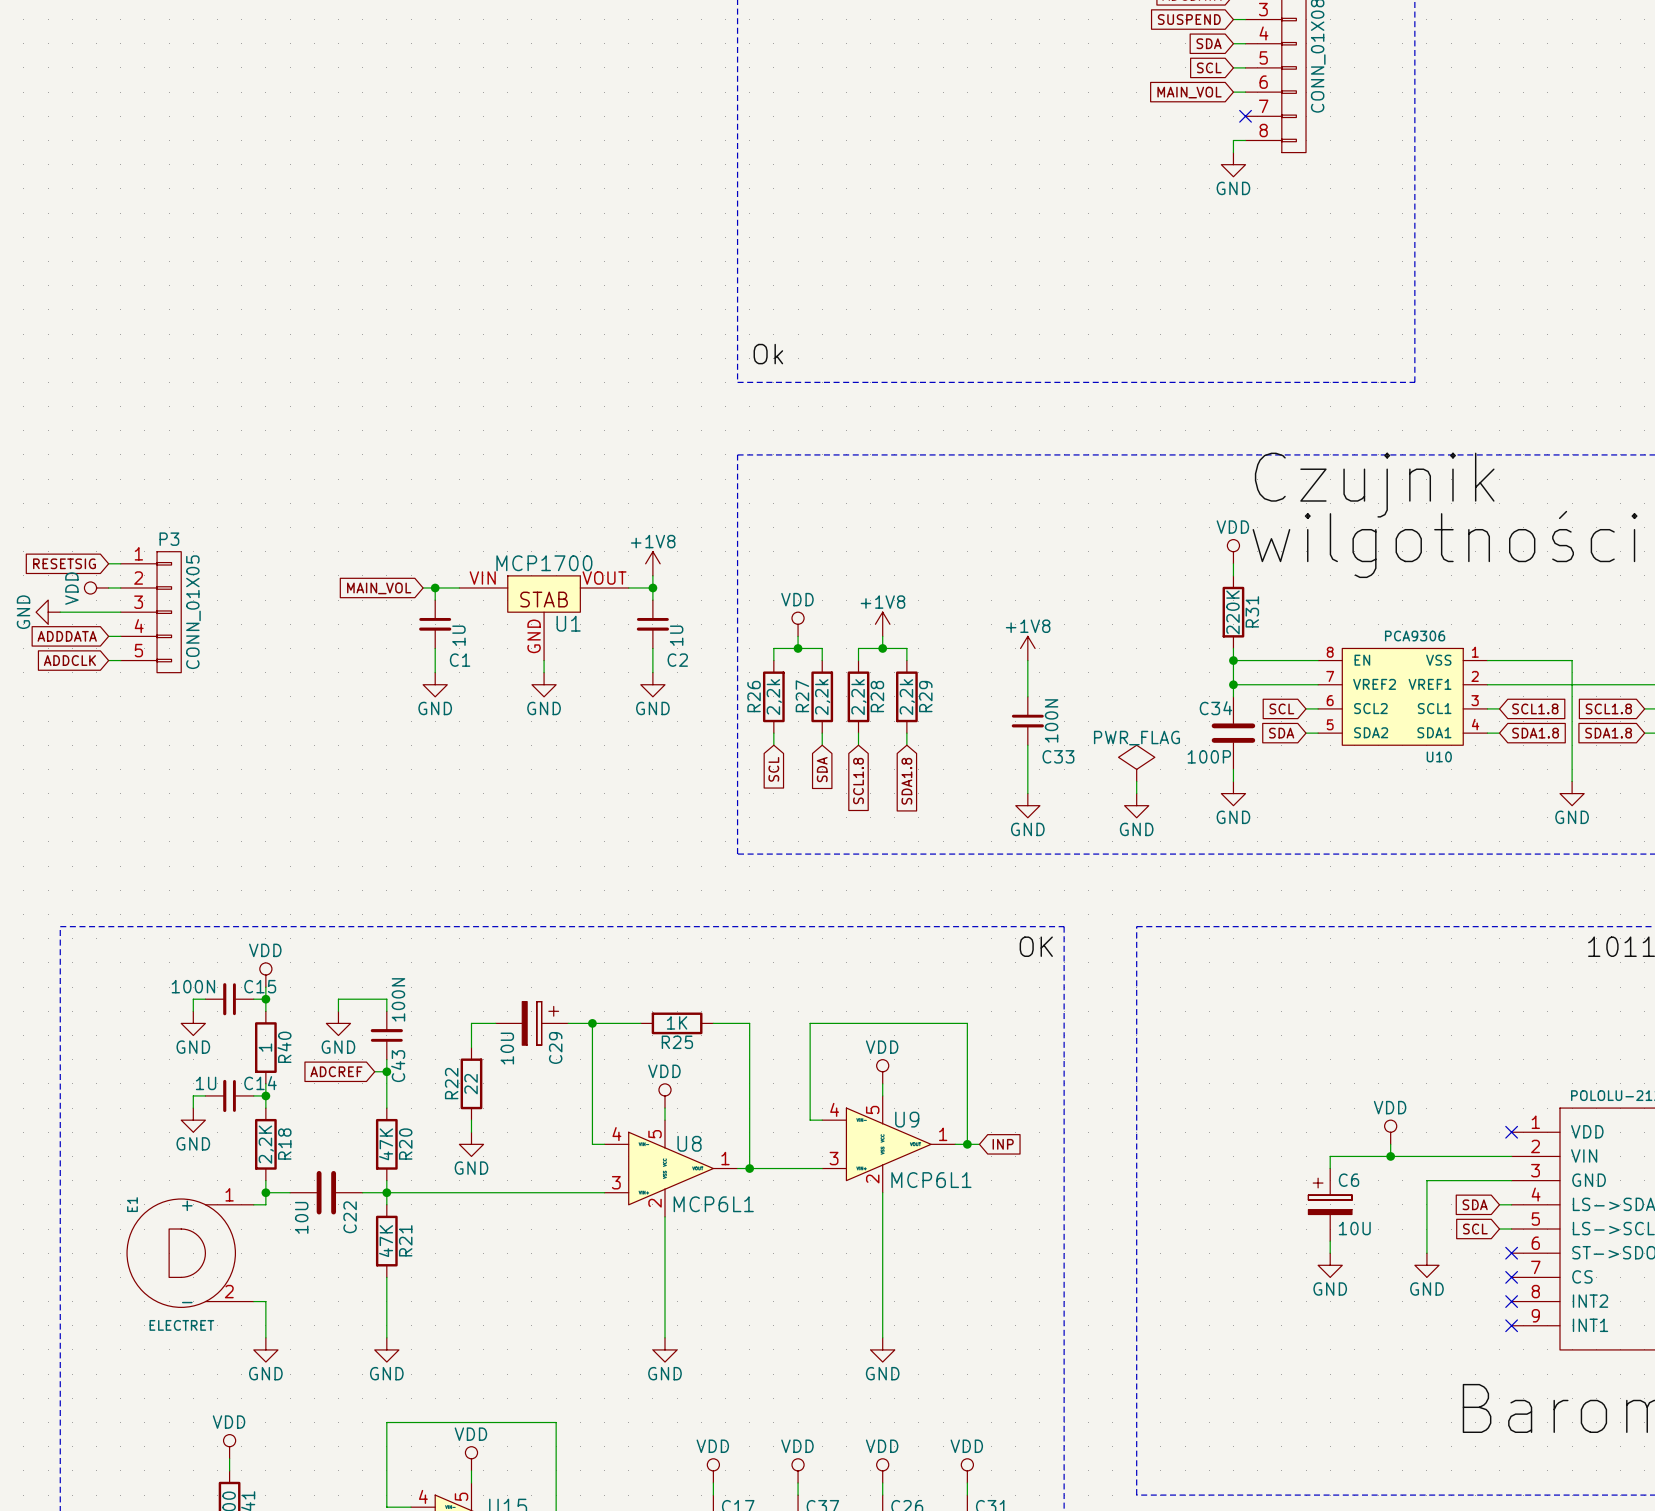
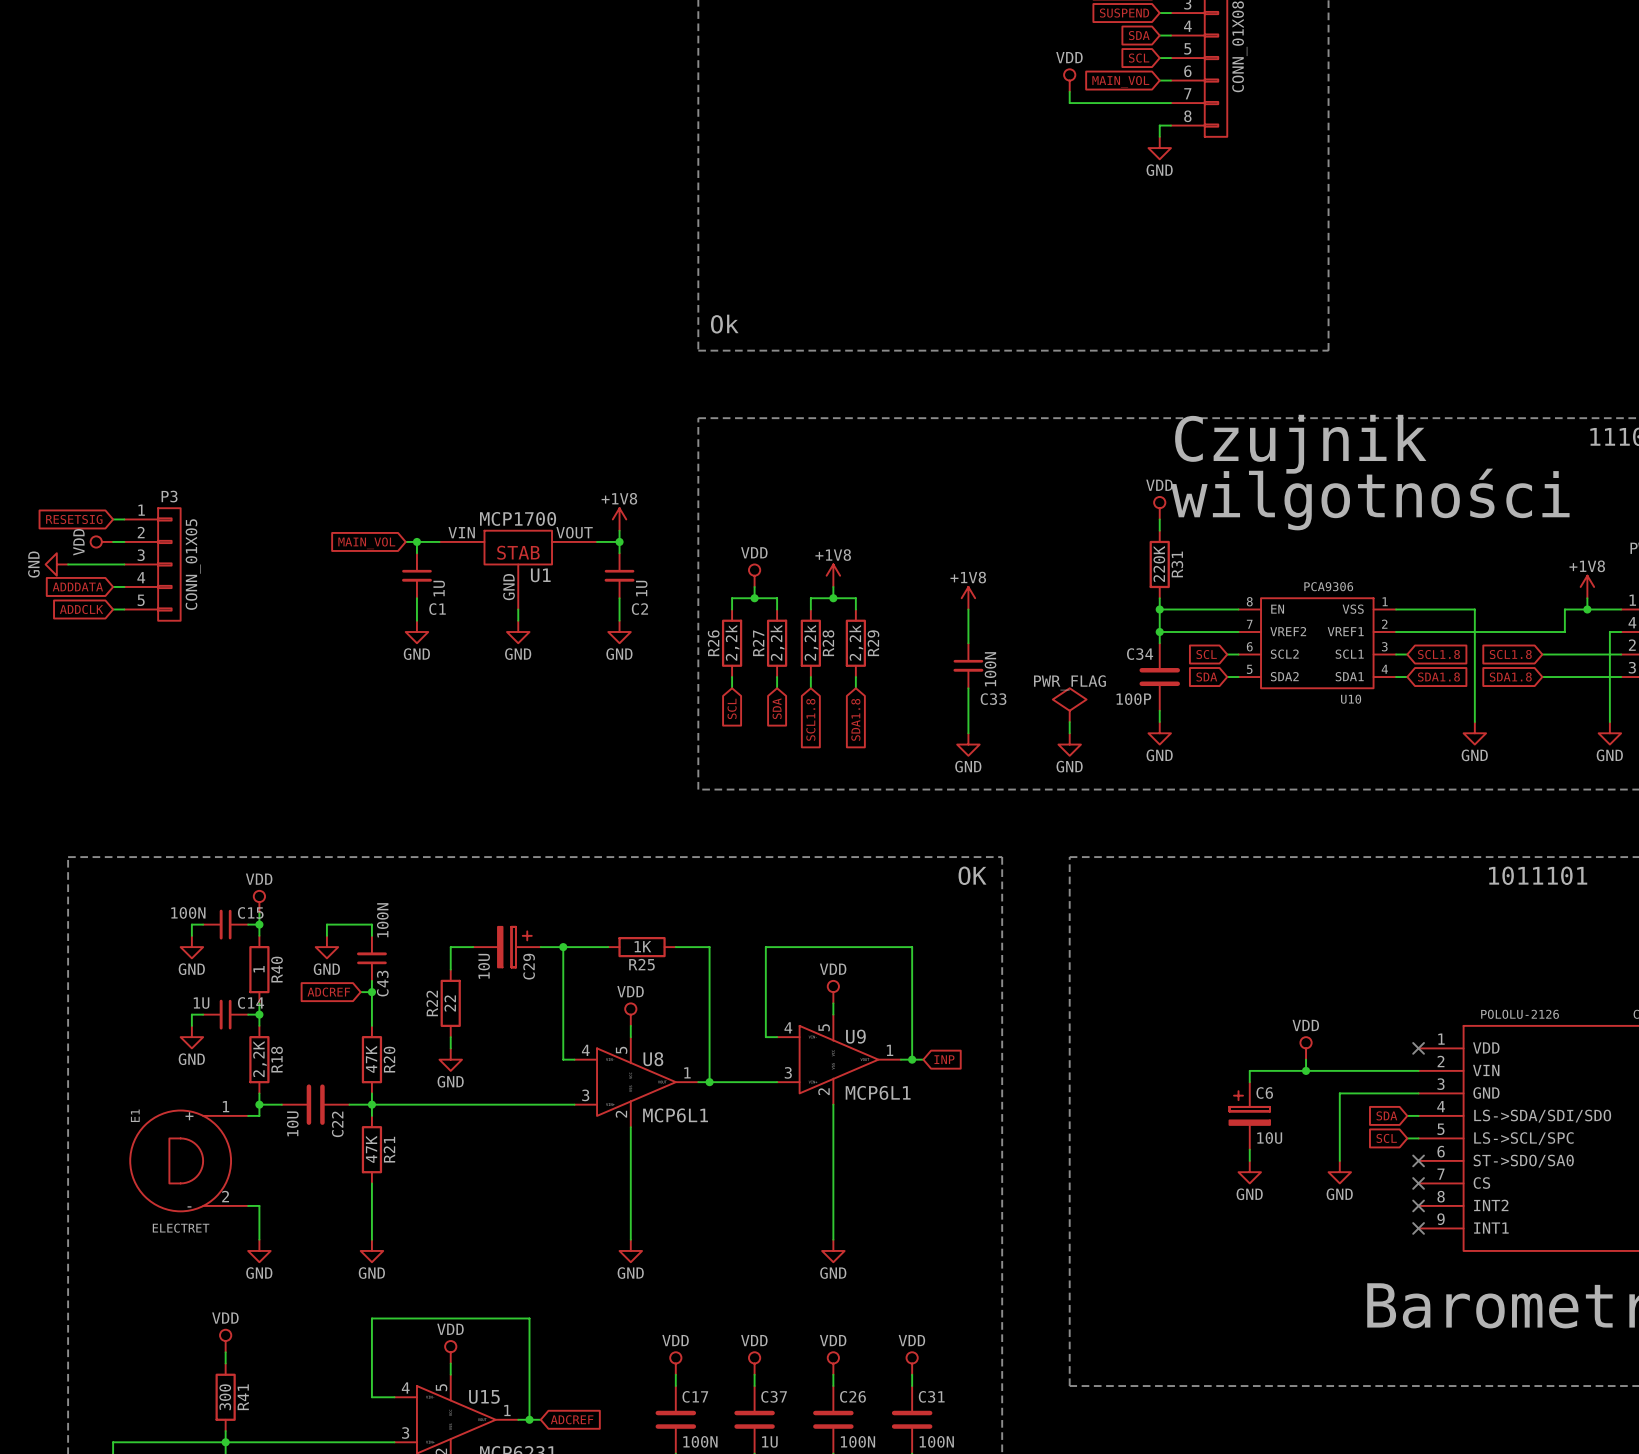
power symbol: none -> VDD (1069, 80)
wire: none -> (1069, 91) (1069, 103) (1170, 103)
no-connect mark: (1245, 116) -> none

